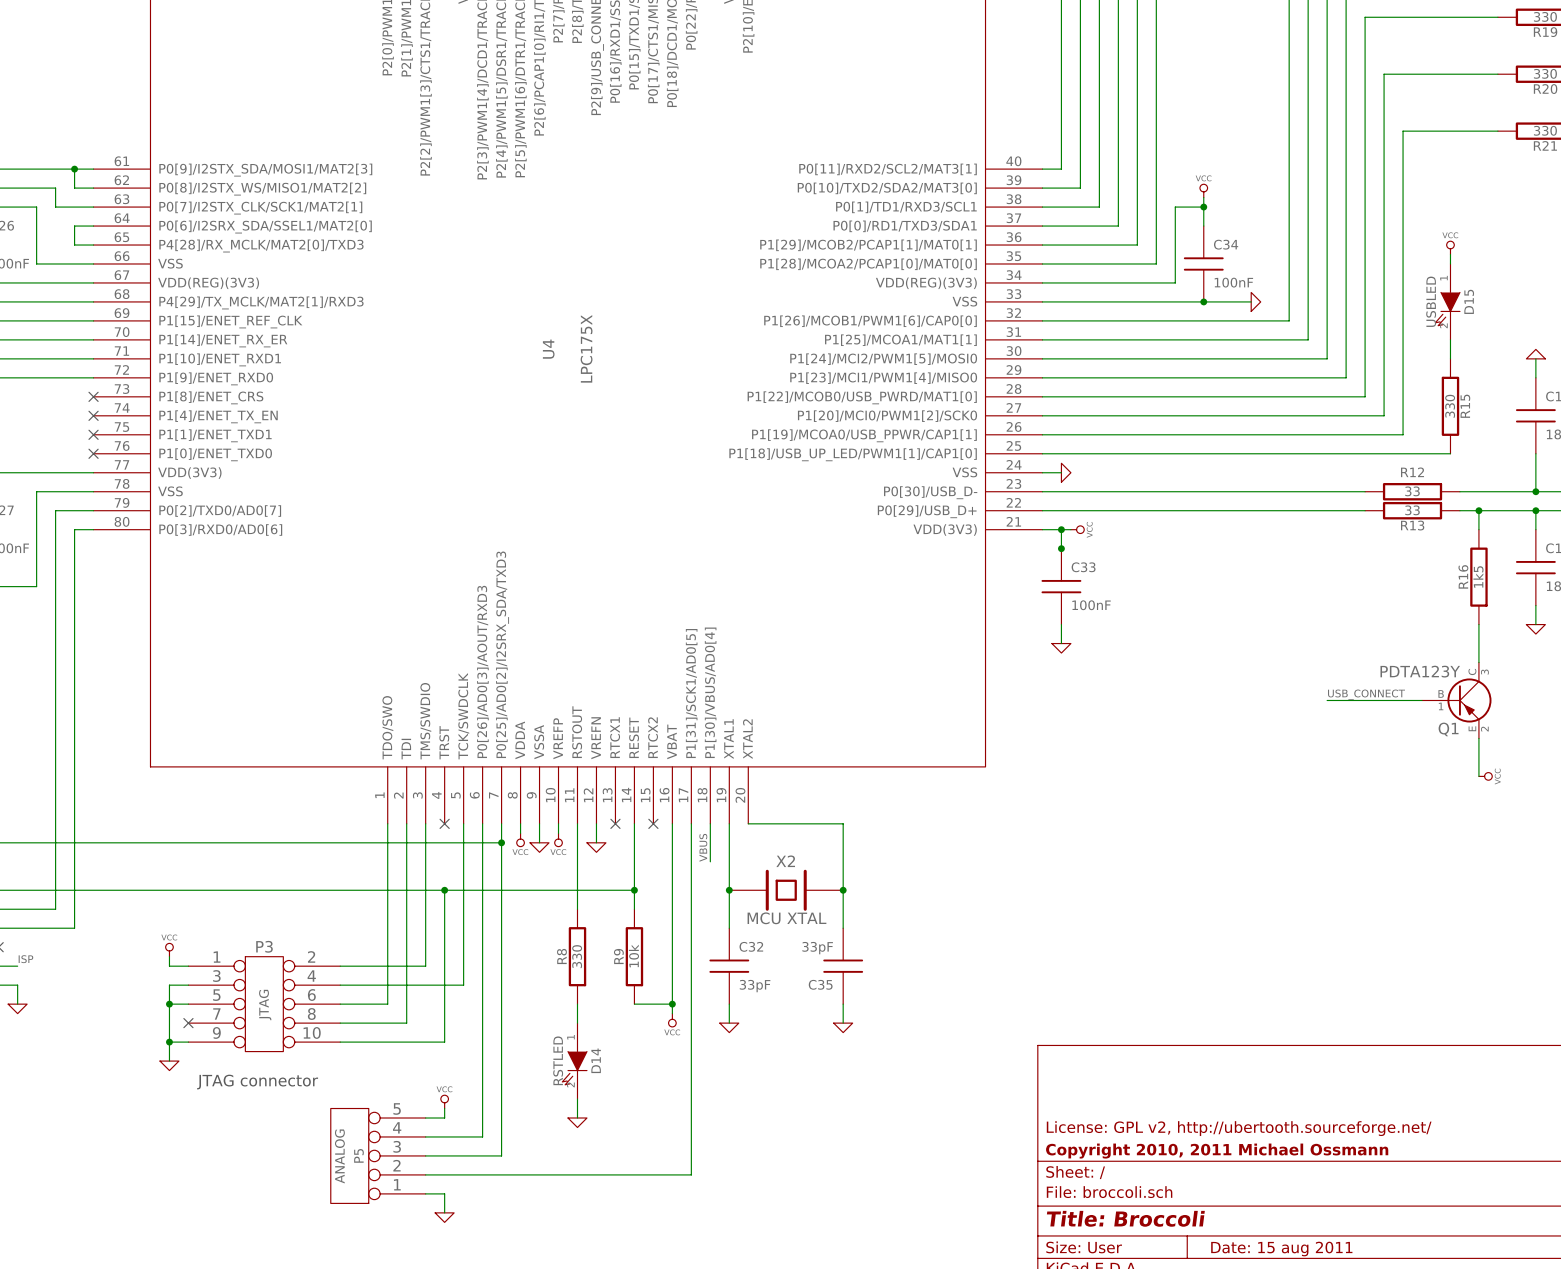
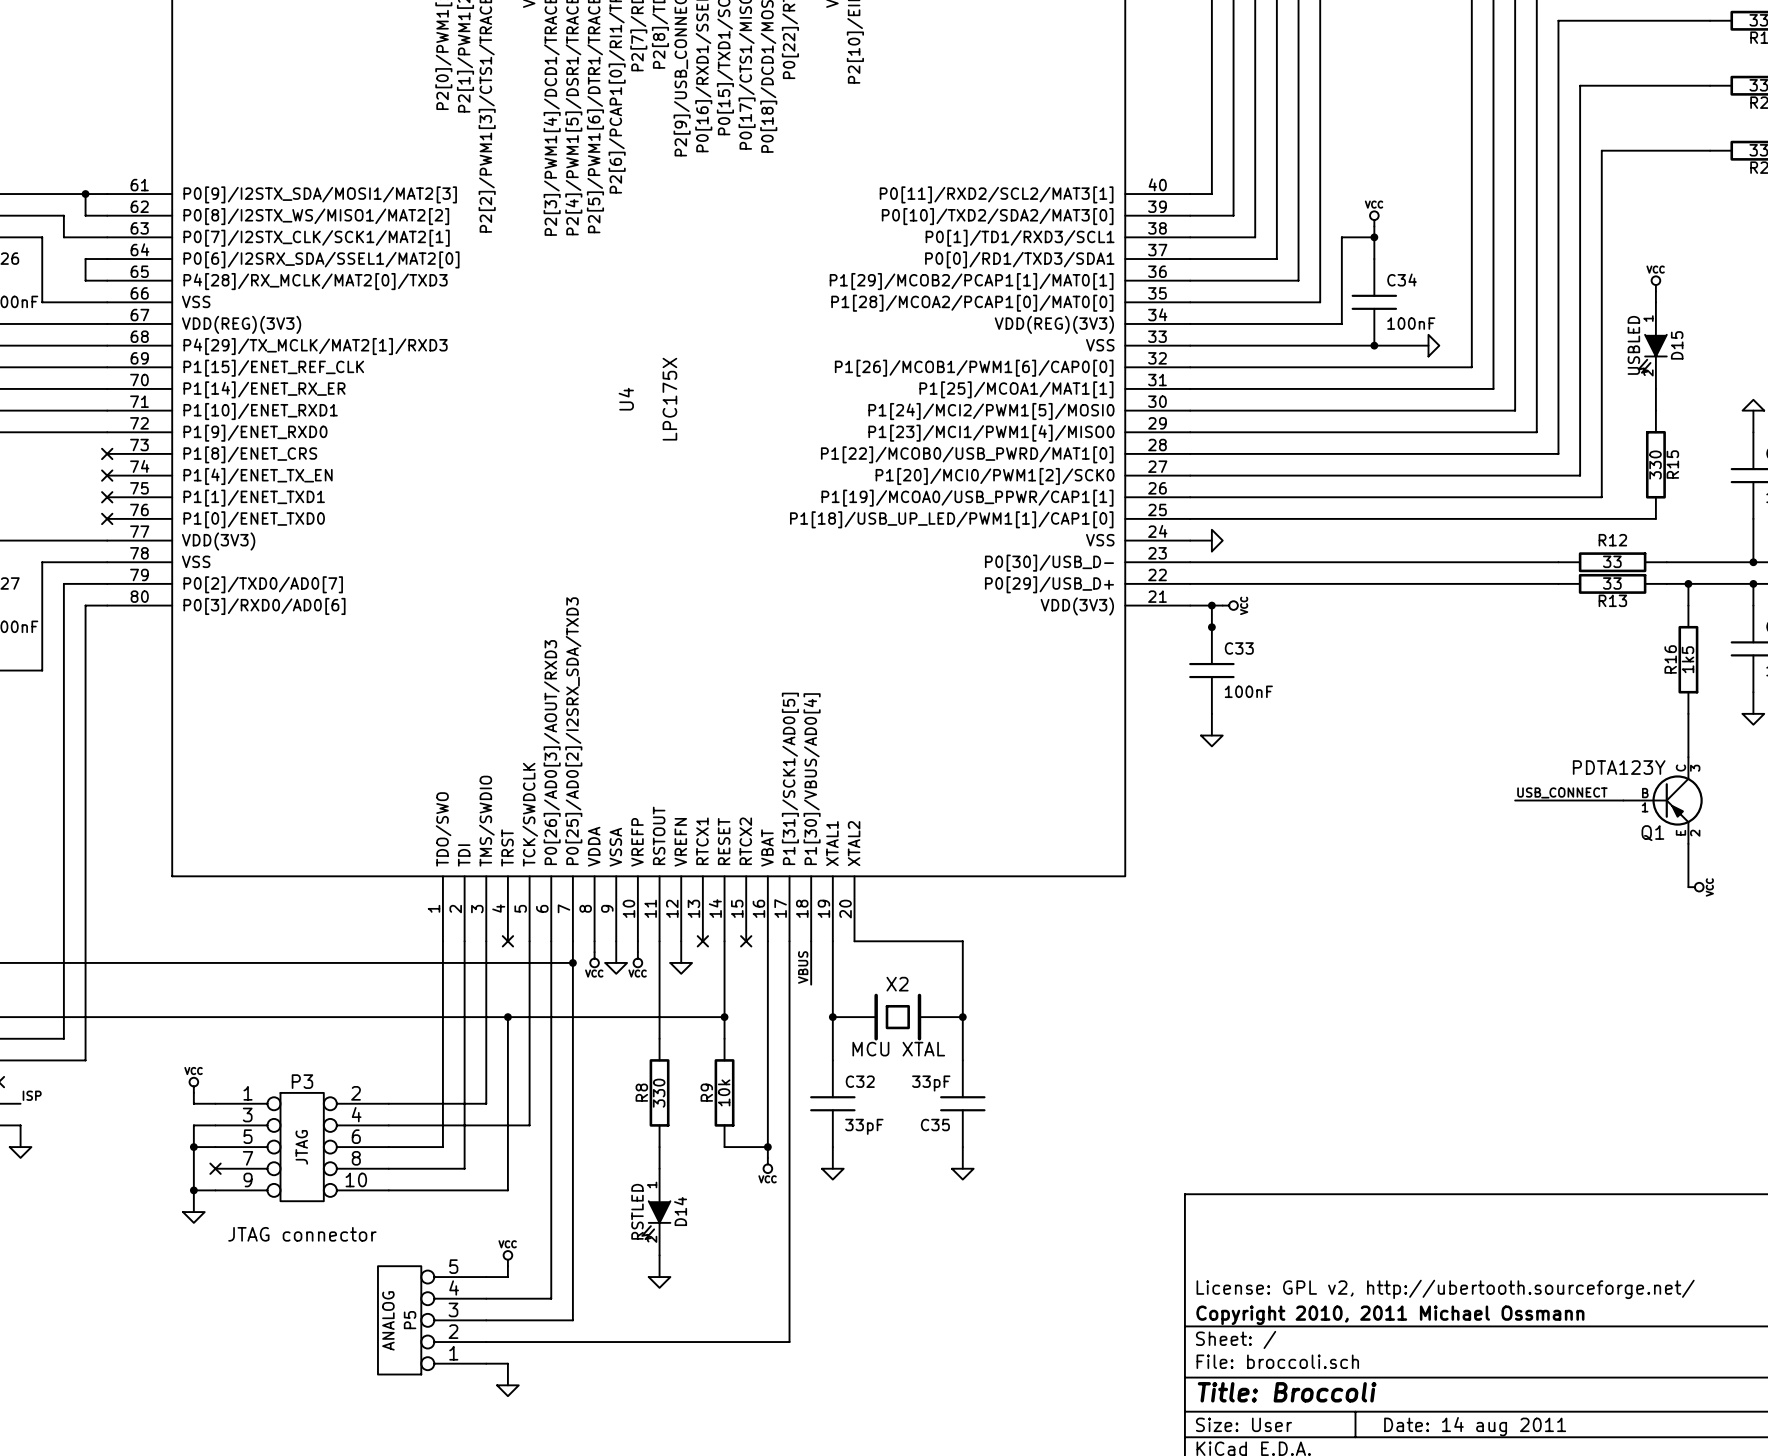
title block: Date: 15 aug 2011 (1281, 1249) -> Date: 14 aug 2011 (1475, 1426)

